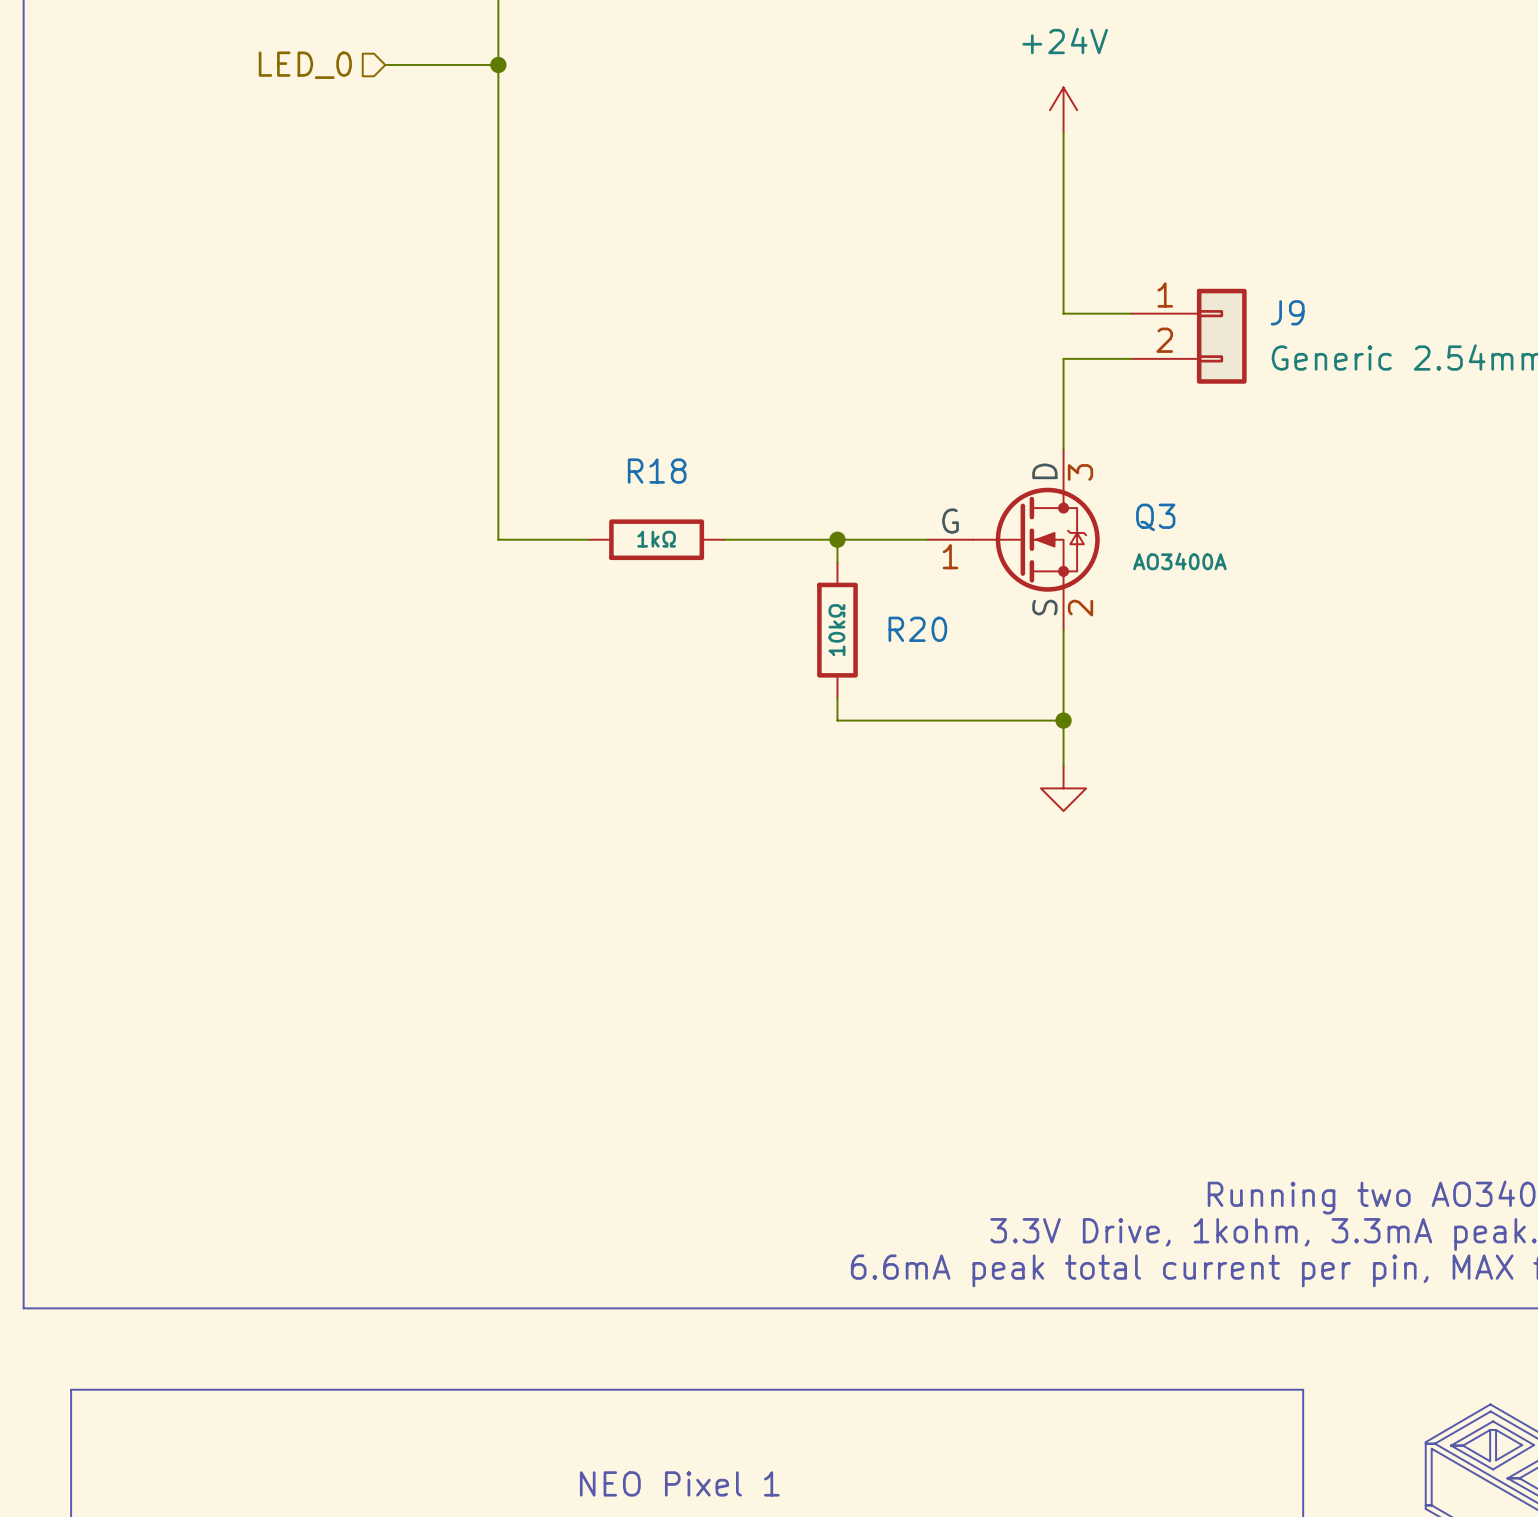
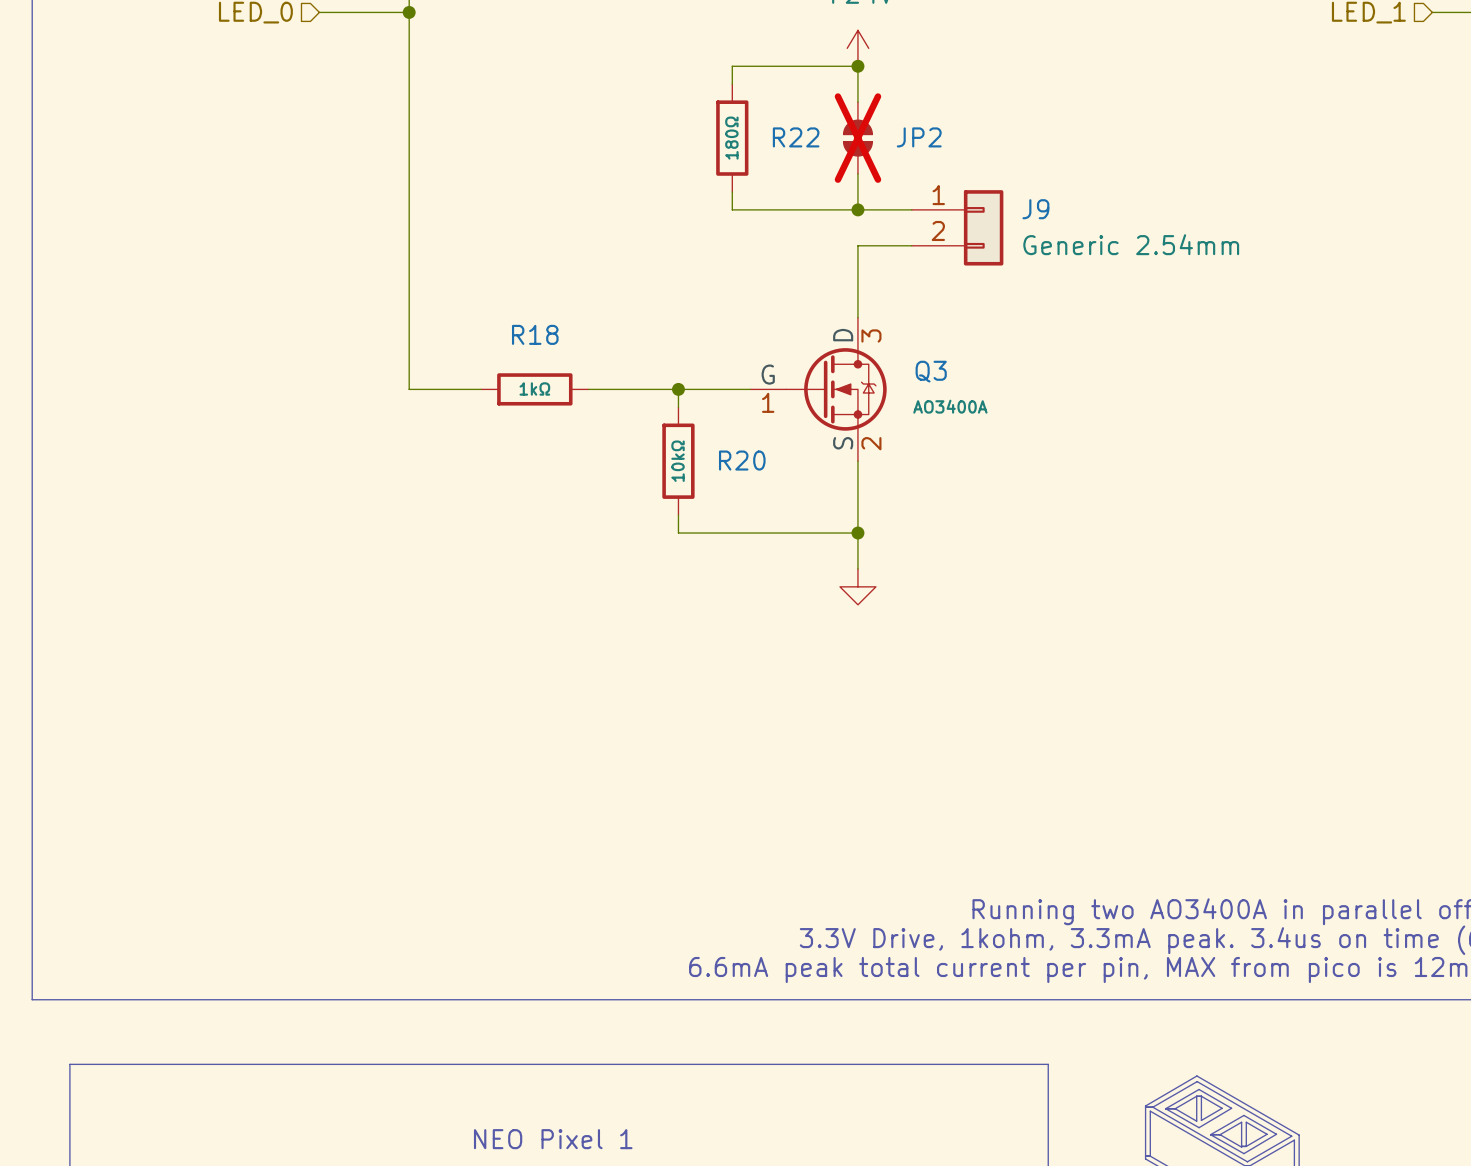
wire: none -> (857, 66) (732, 66) (732, 84)
junction: none -> (857, 66)
R22: none -> 180Ω (732, 138)
JP2: none -> (857, 138)
wire: none -> (732, 191) (732, 209) (857, 209)
junction: none -> (857, 209)

